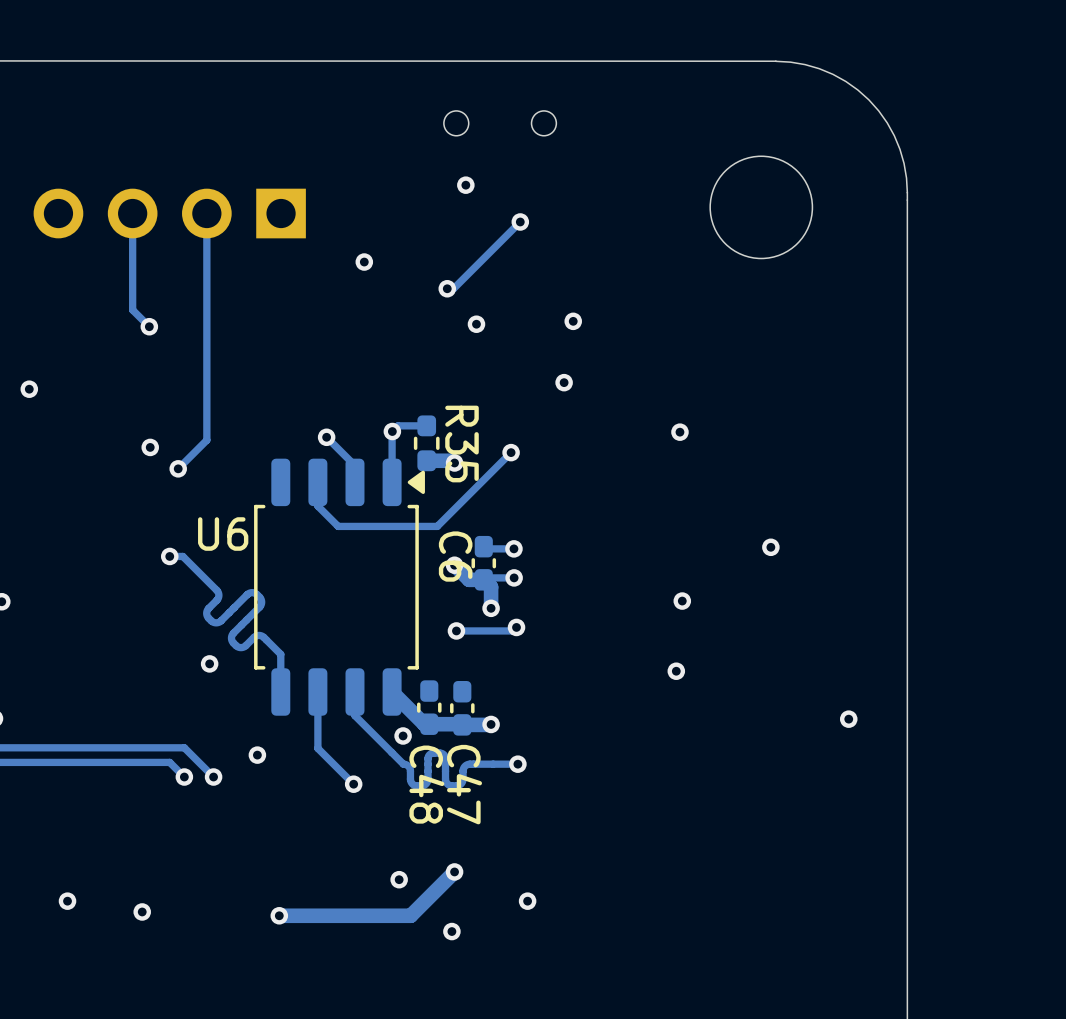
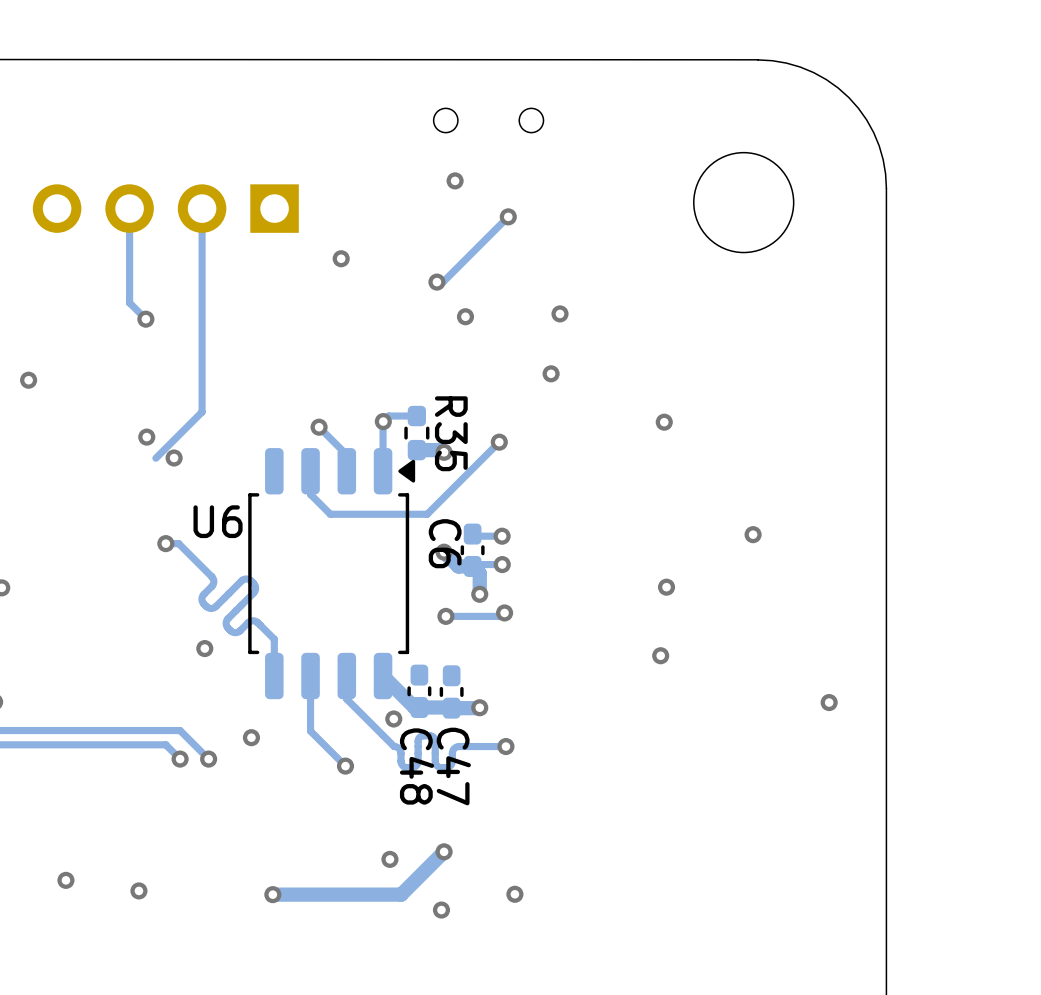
via position: (364, 262) -> (341, 258)
track: (206, 421) (206, 440) (178, 468) -> (202, 412) (155, 458)
via position: (527, 901) -> (514, 894)

